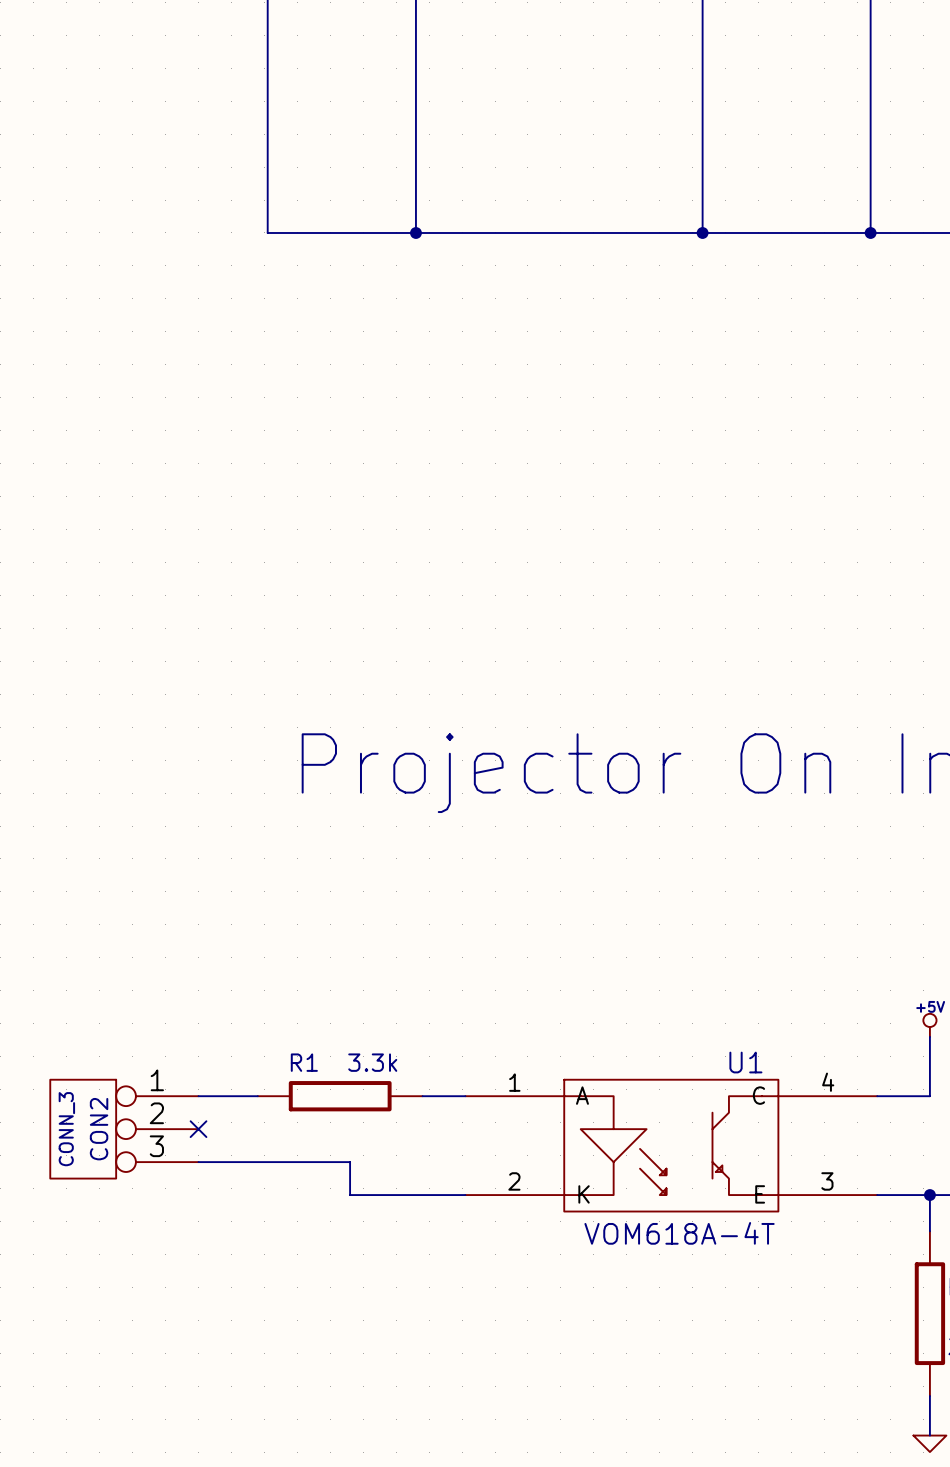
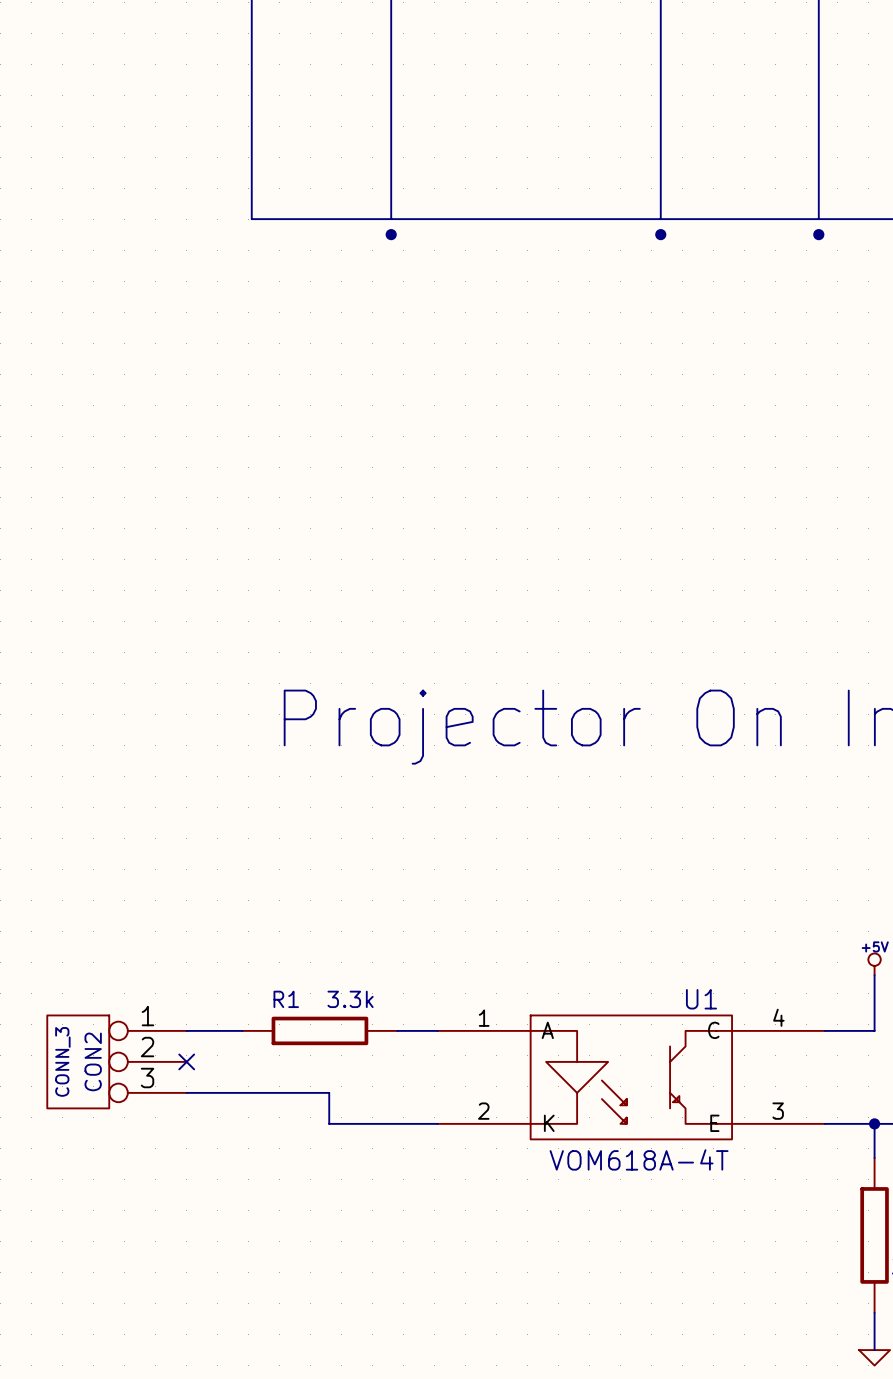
junction position: (415, 232) -> (391, 234)
junction position: (702, 232) -> (660, 234)
junction position: (870, 232) -> (818, 234)

